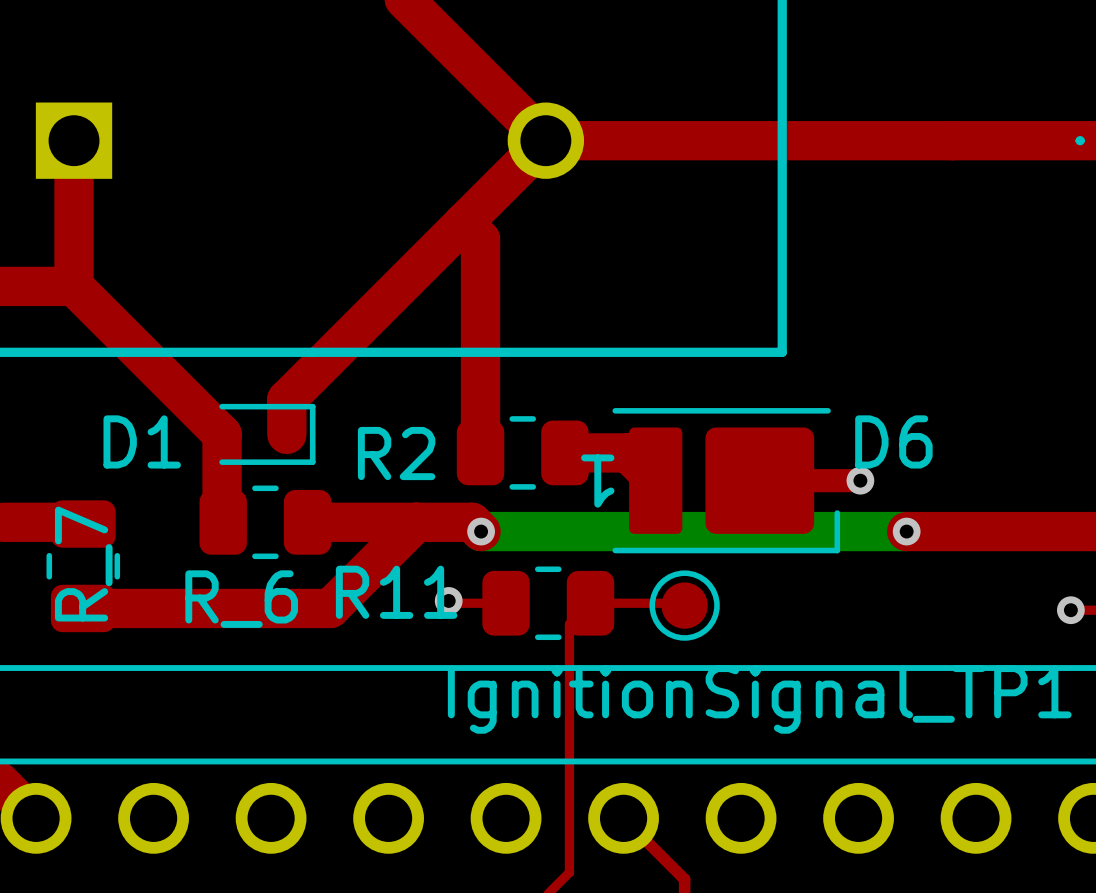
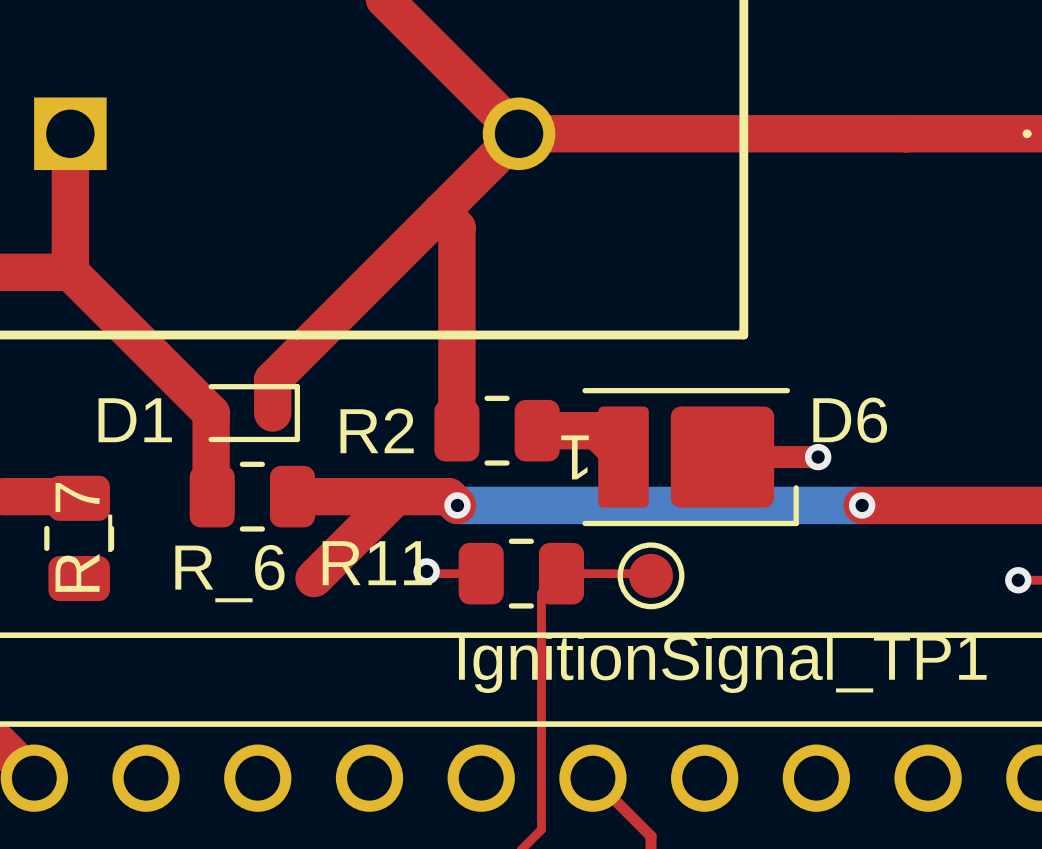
top track: (83, 608) (330, 608) -> none

